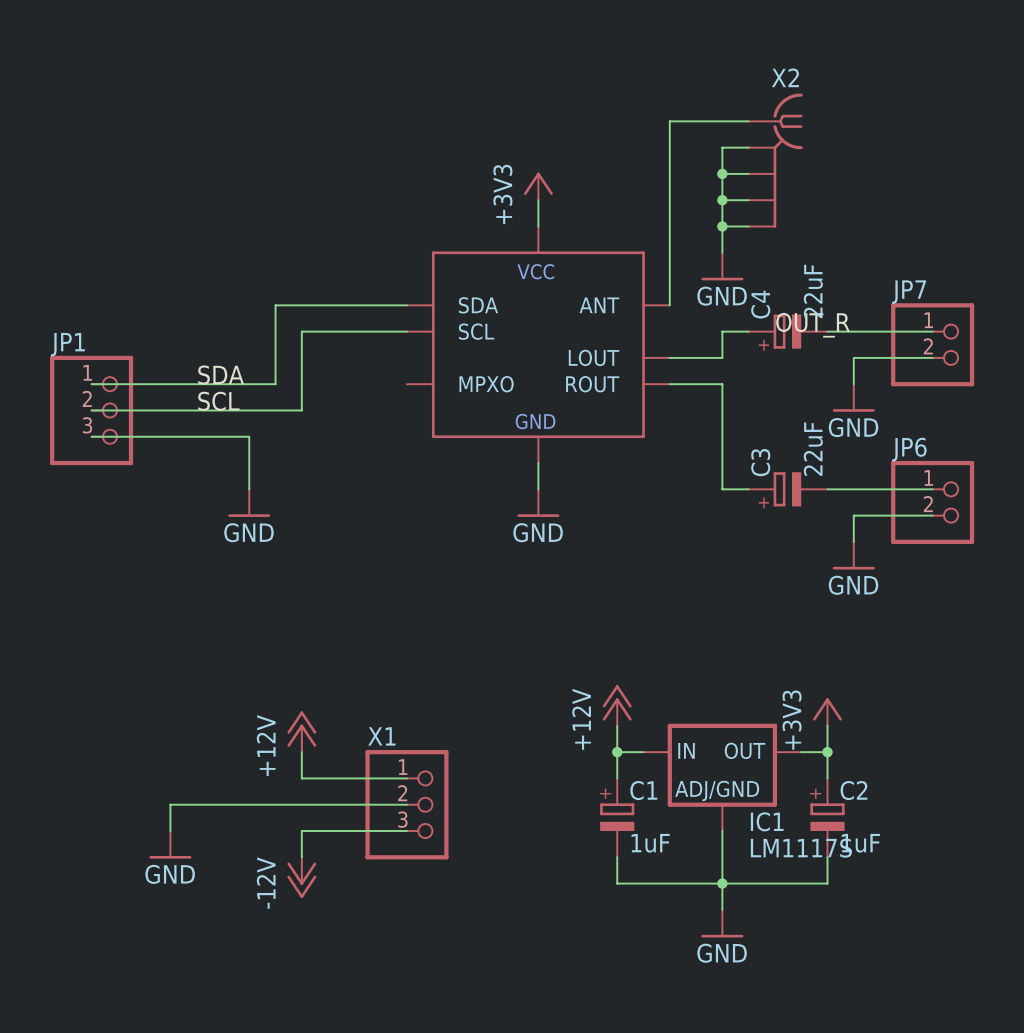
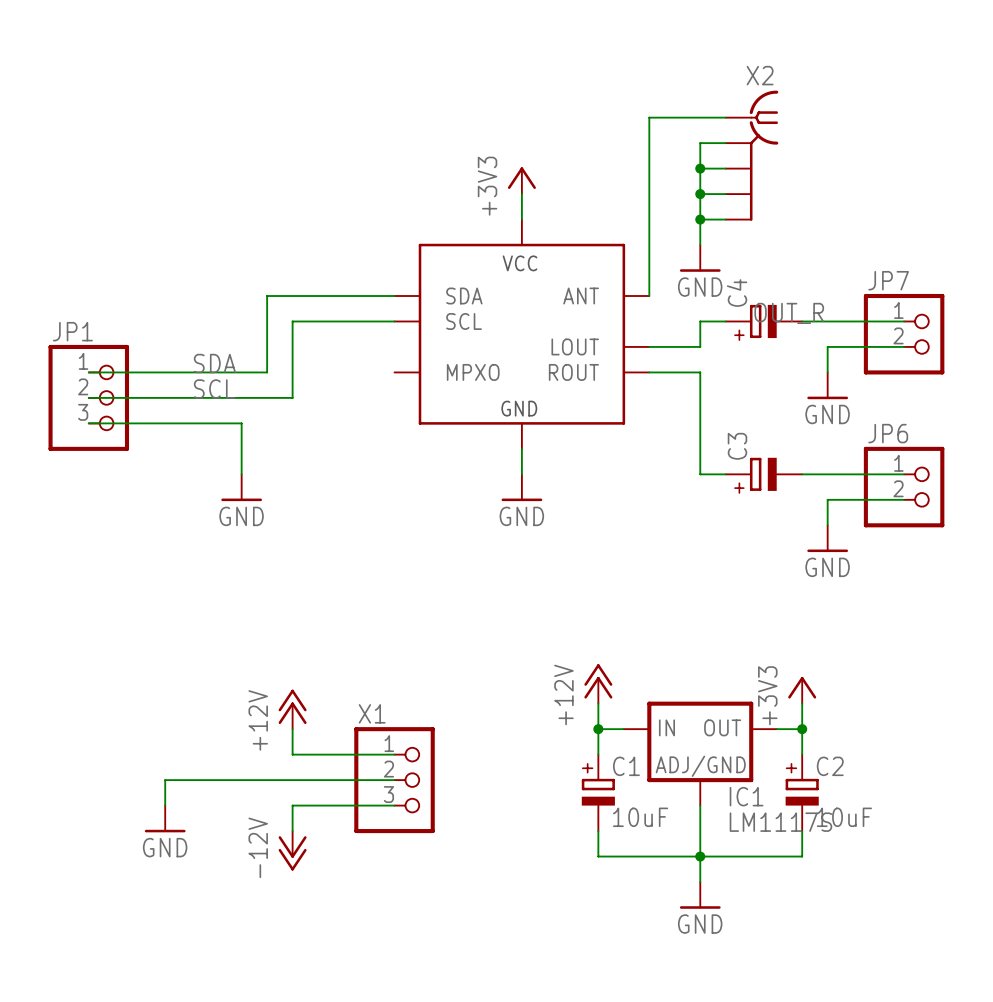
C4 value: 22uF (813, 291) -> none
C3 value: 22uF (813, 449) -> none
C1 value: 1uF (650, 843) -> 10uF (640, 817)
C2 value: 1uF (860, 843) -> 10uF (844, 817)

